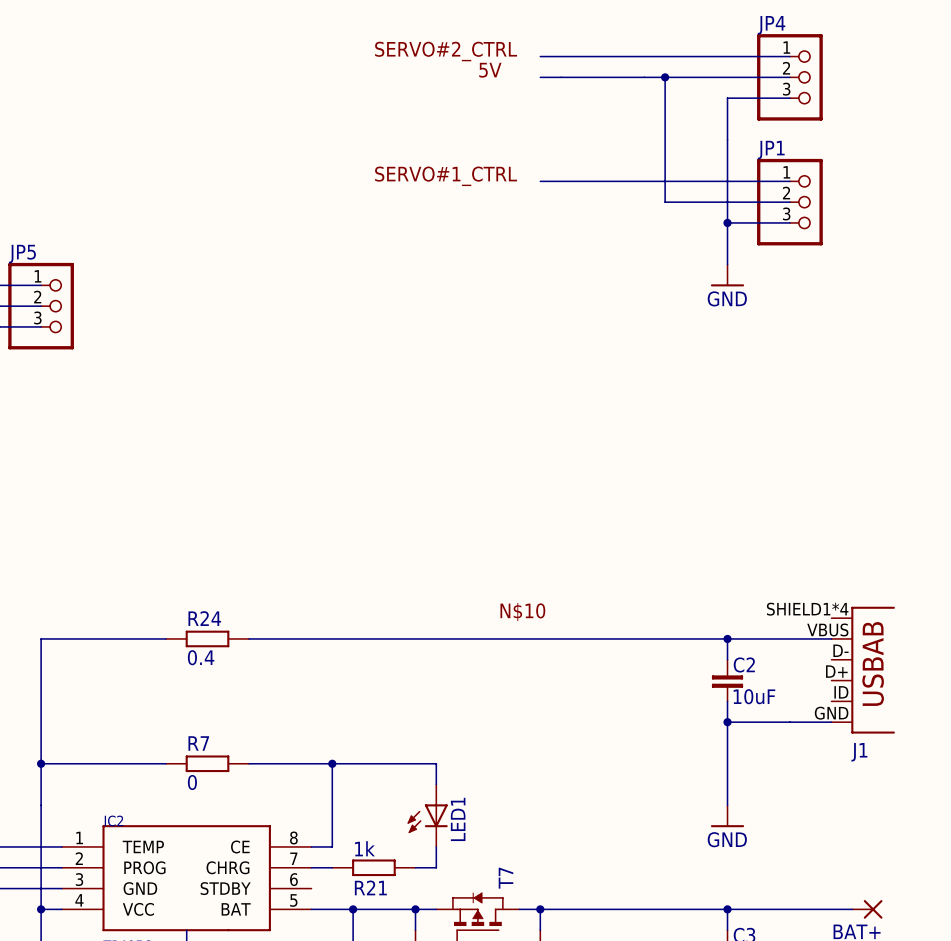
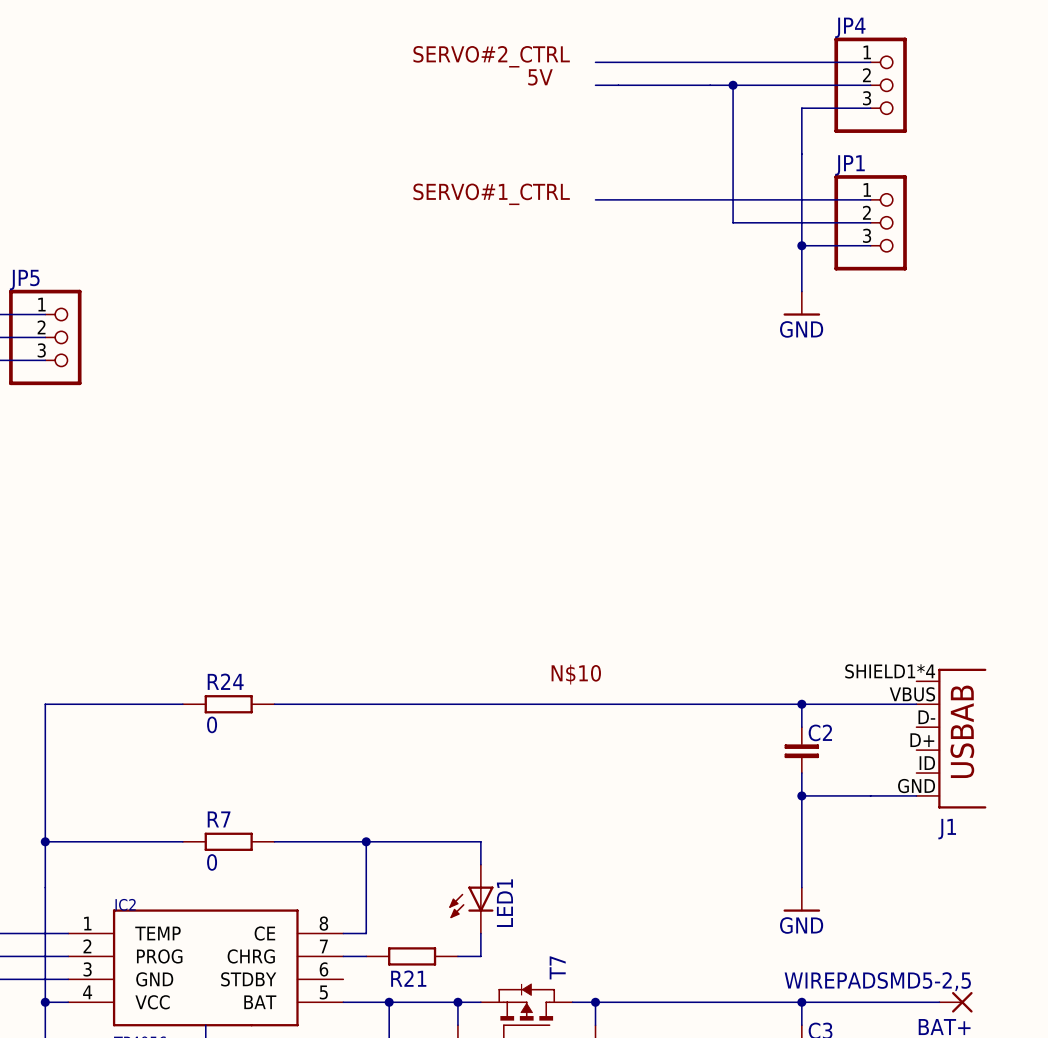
R24 value: 0.4 (201, 657) -> 0 (212, 724)
C2 value: 10uF (754, 696) -> none
R21 value: 1k (364, 848) -> none
BAT+ value: none -> WIREPADSMD5-2,5 (877, 981)

